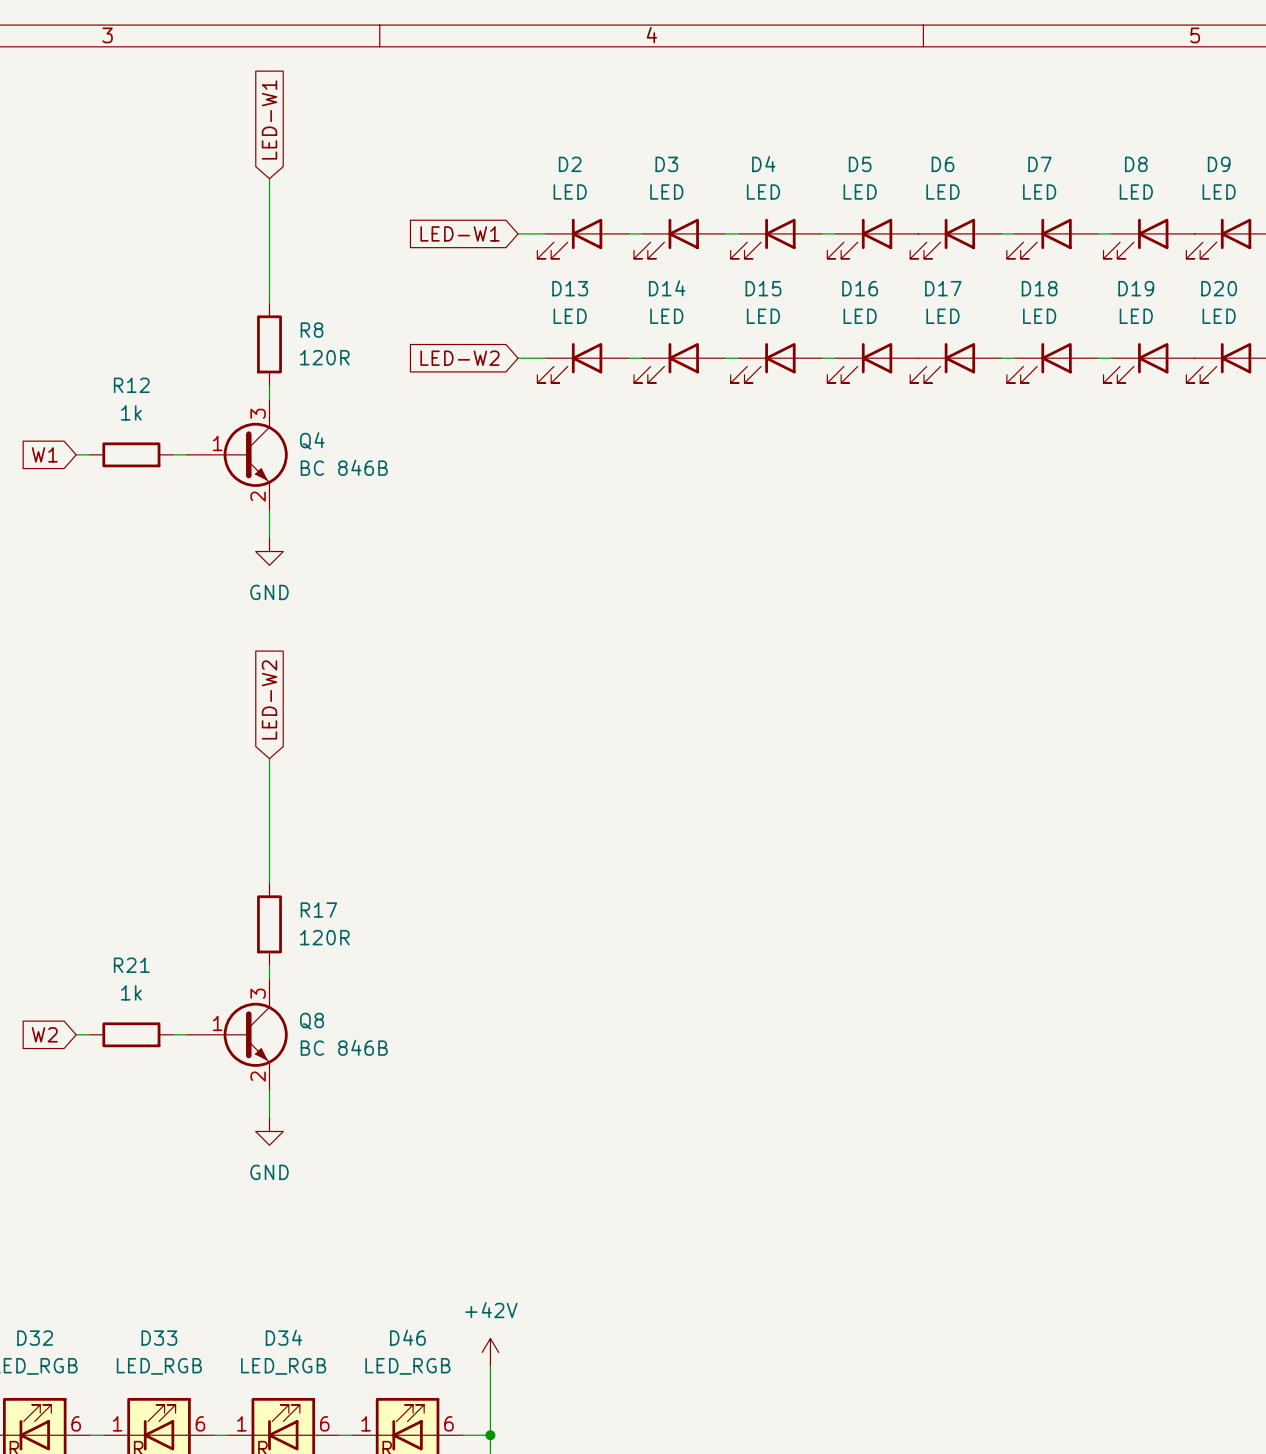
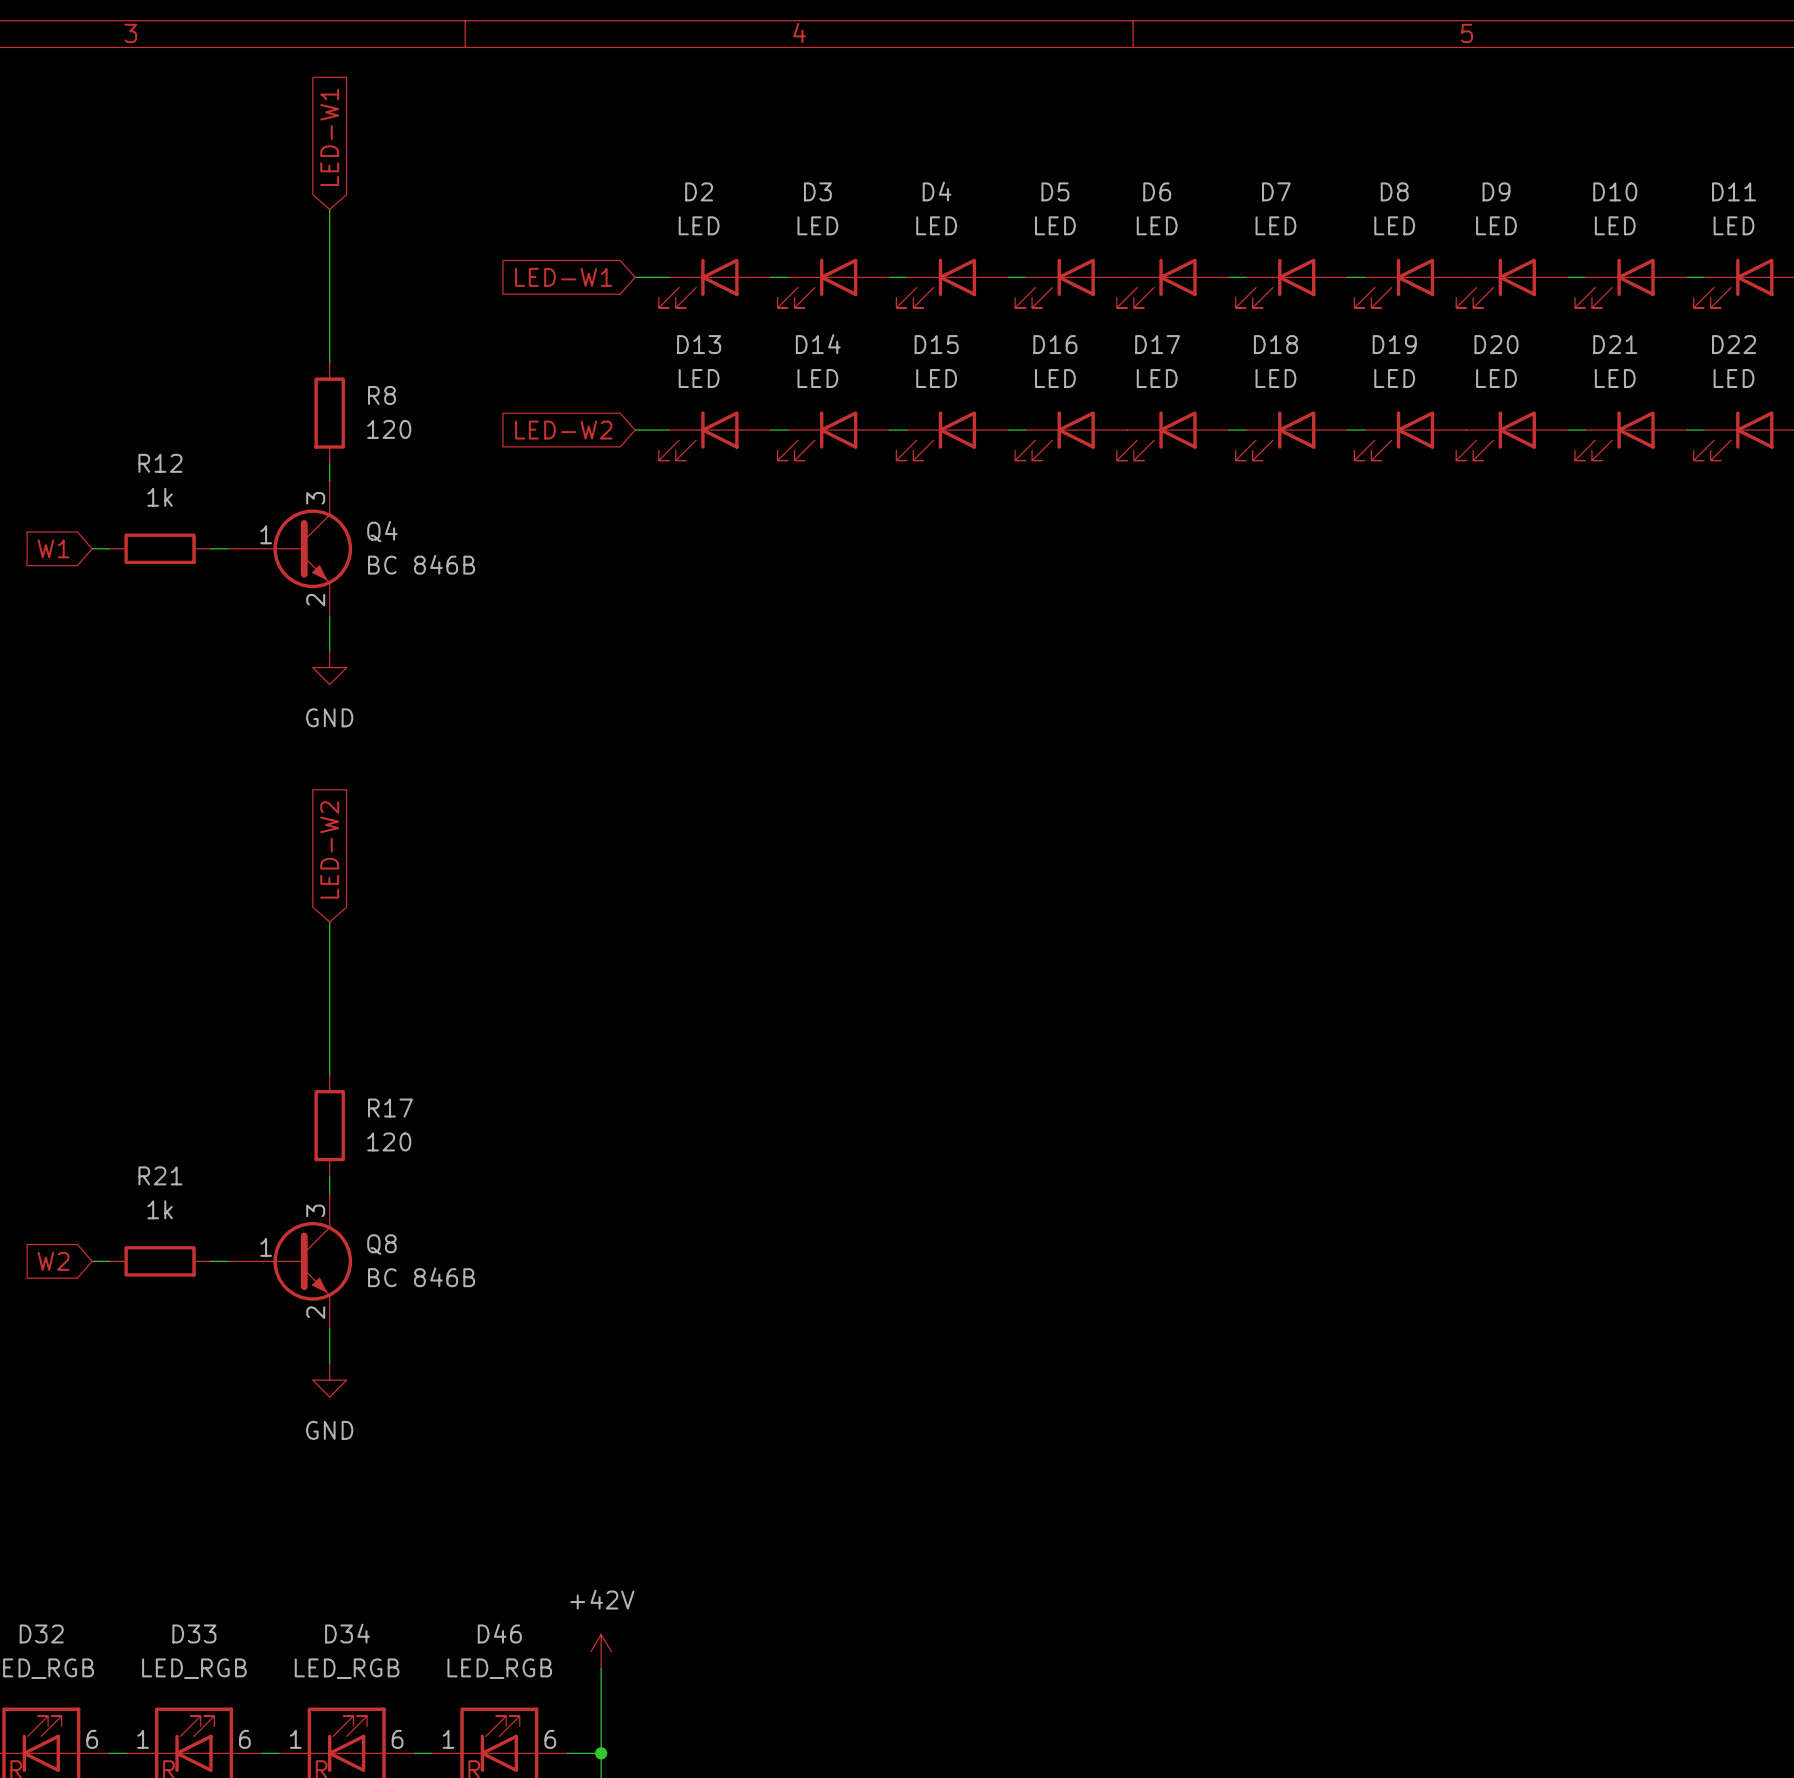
R8 value: 120R (324, 357) -> 120 (389, 429)
R17 value: 120R (324, 937) -> 120 (389, 1141)

